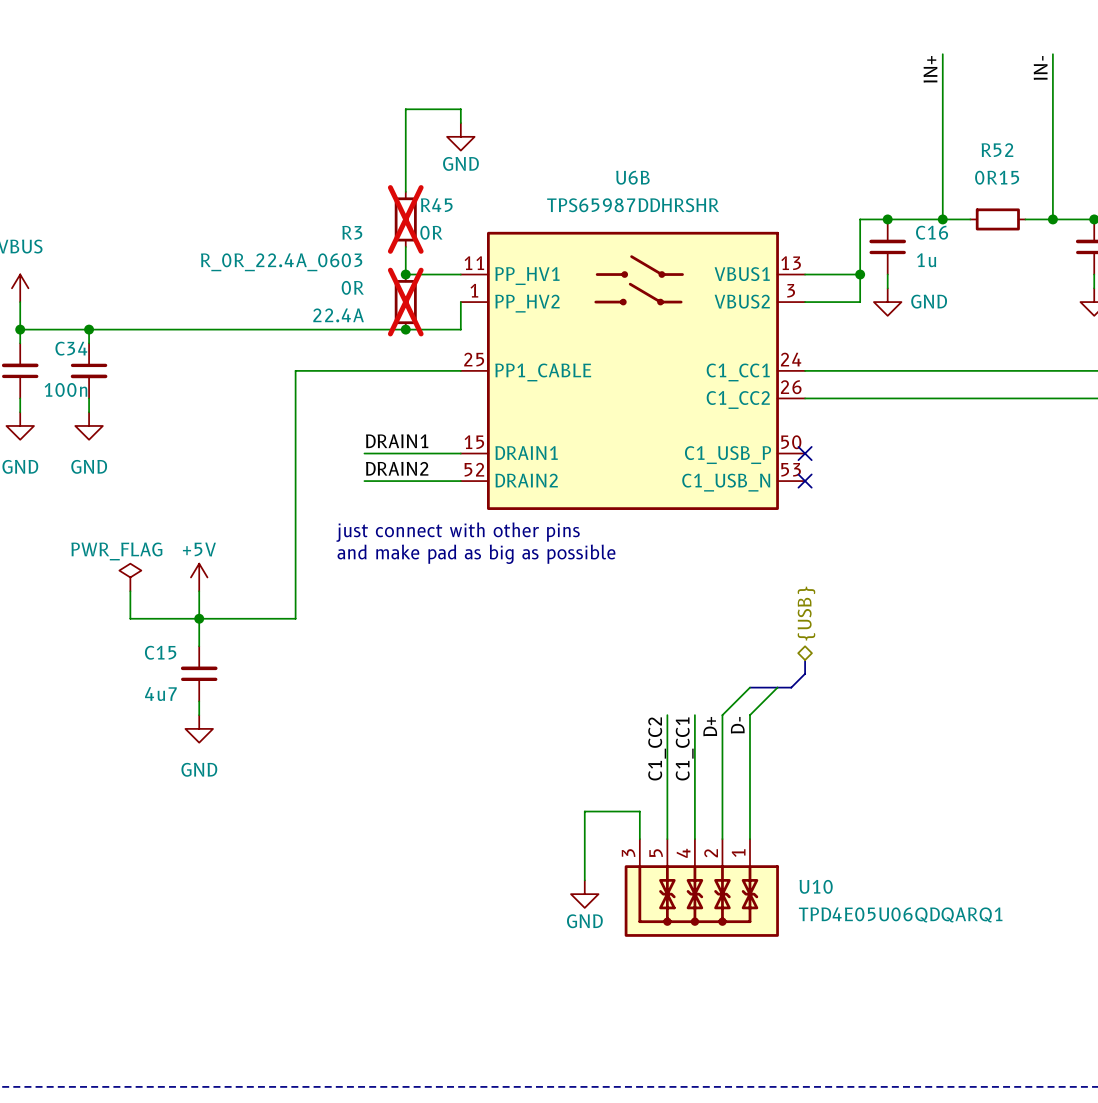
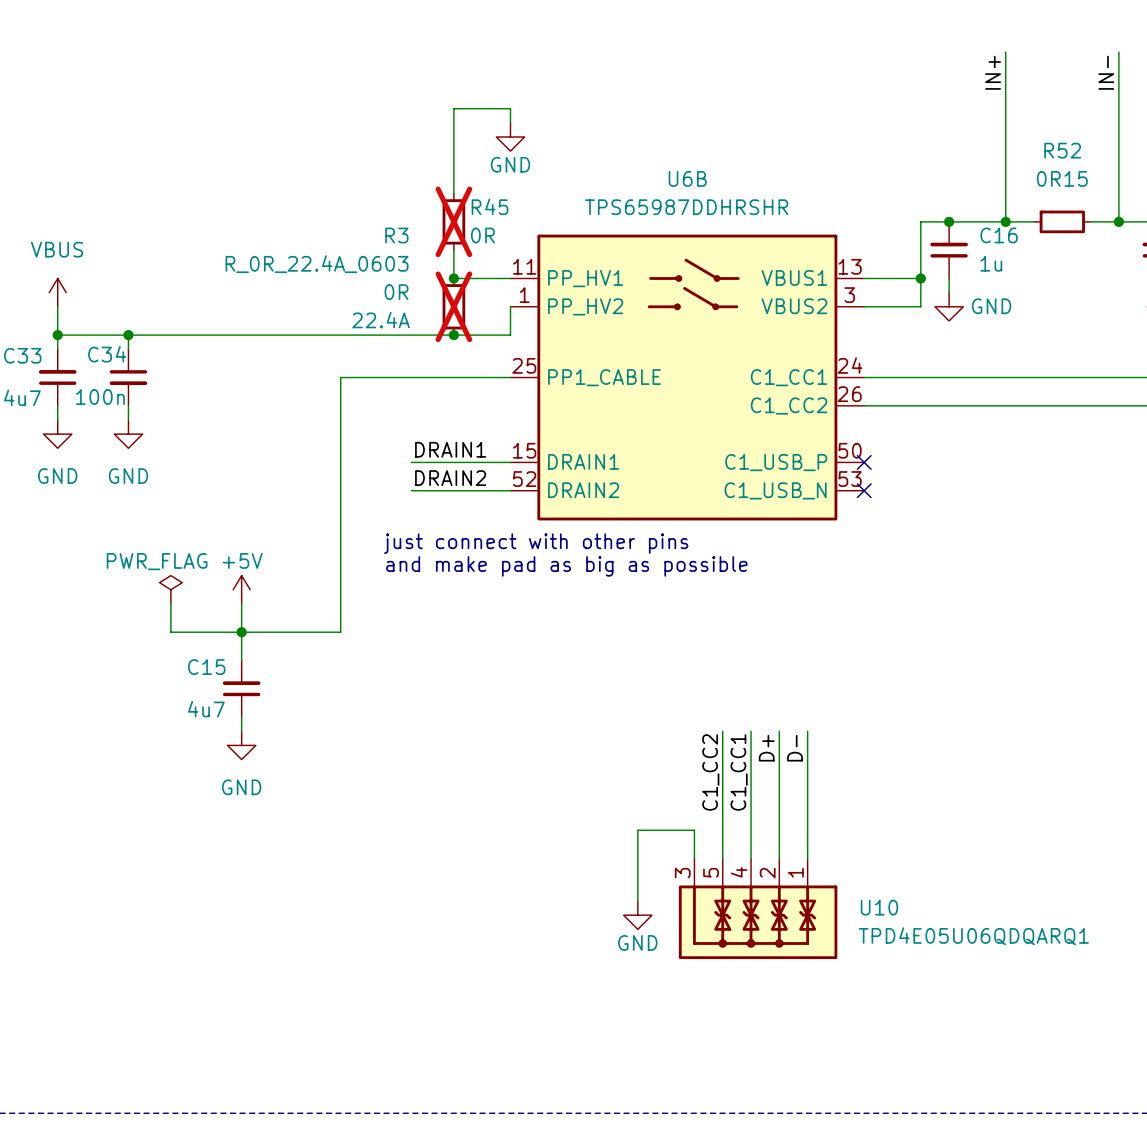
hierarchical label: {USB} (806, 613) -> none
bus: (805, 660) (805, 673) (791, 687) (750, 687) -> none
wire: (750, 687) (722, 715) -> none
wire: (777, 687) (750, 715) -> none

